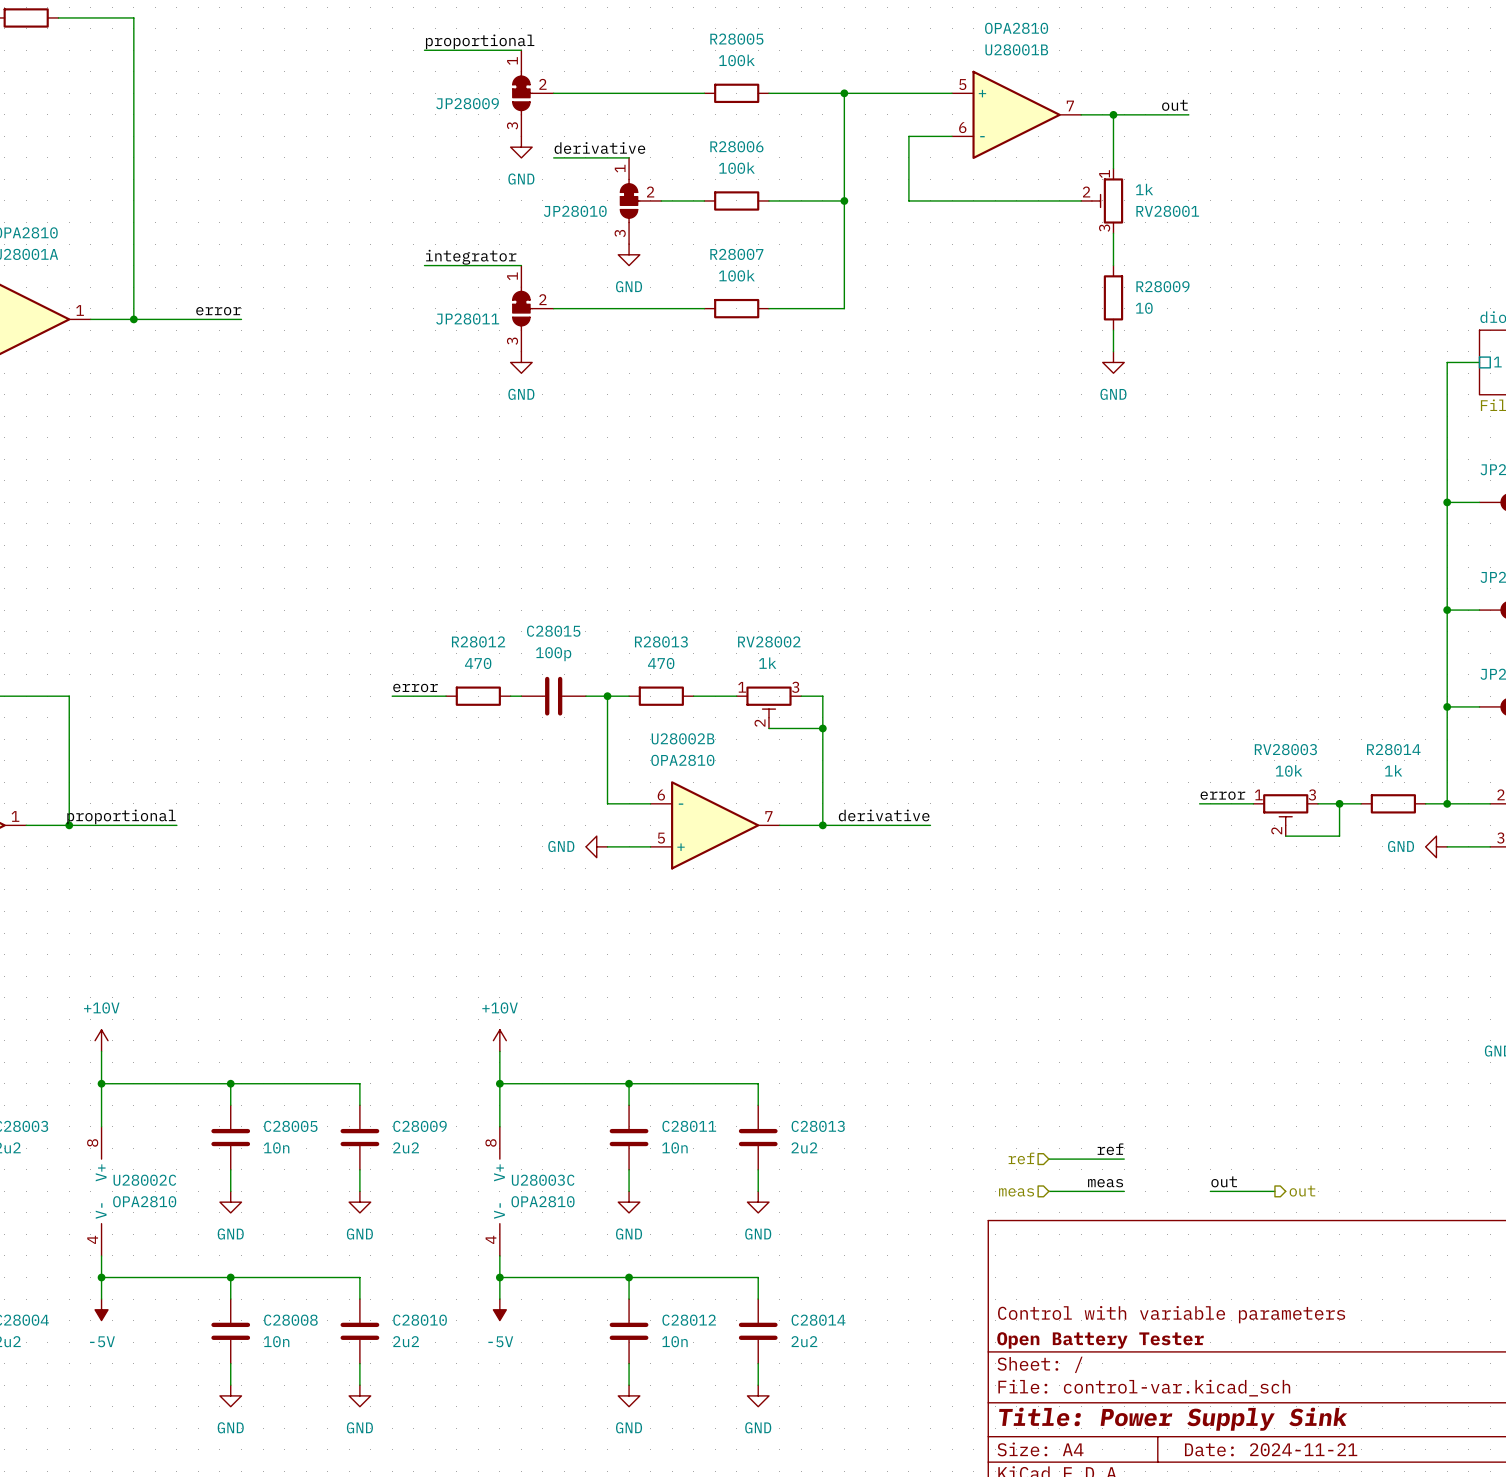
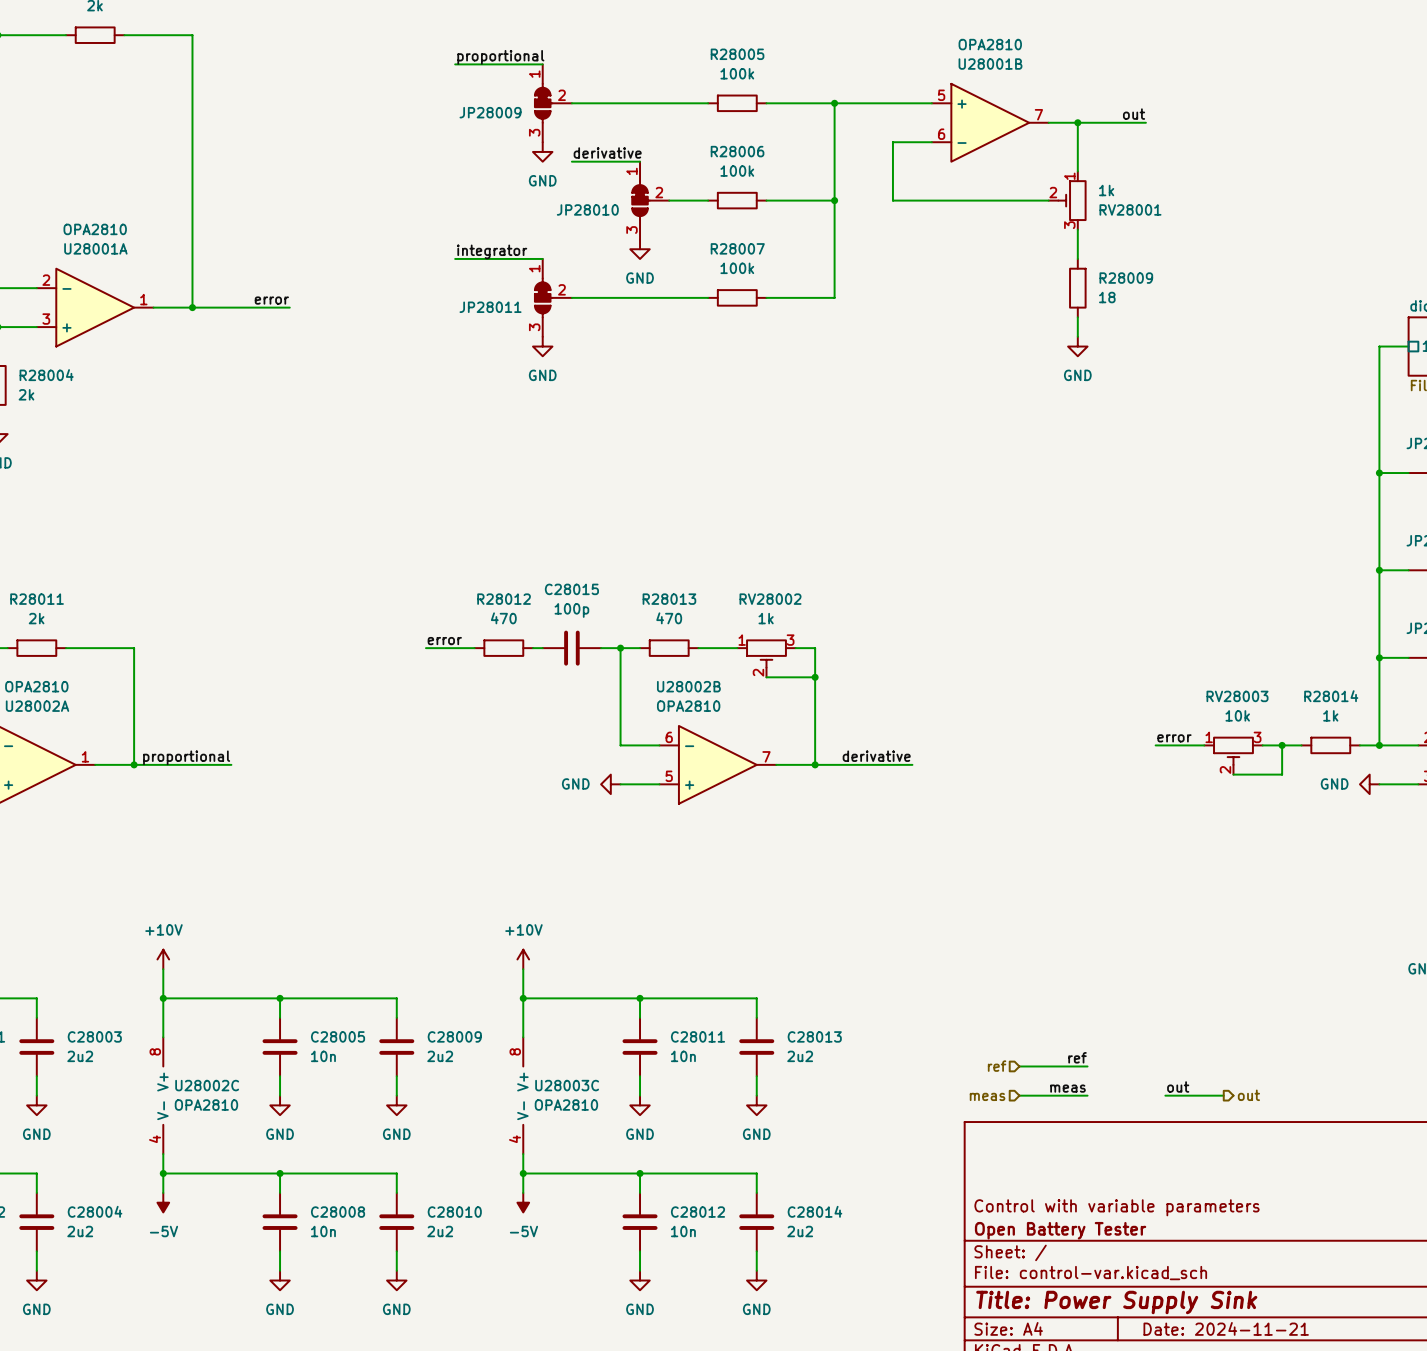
R28009 value: 10 (1144, 308) -> 18 (1107, 297)

